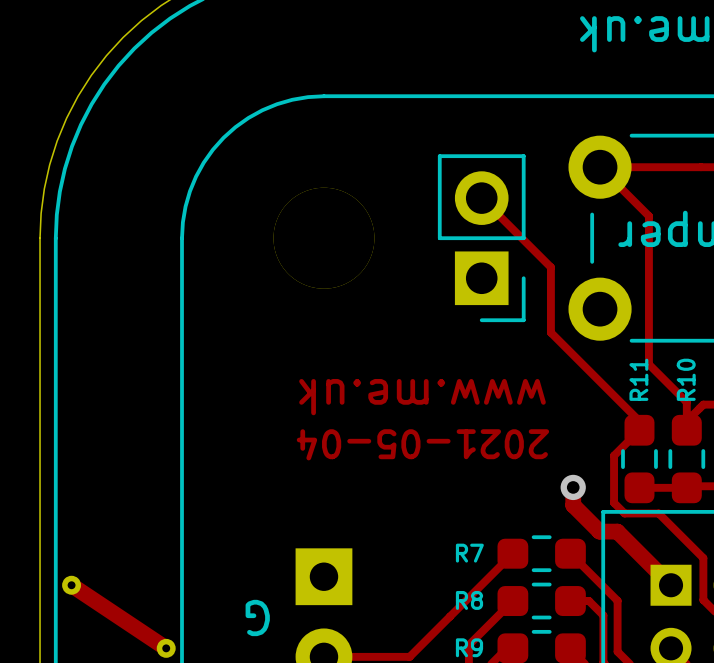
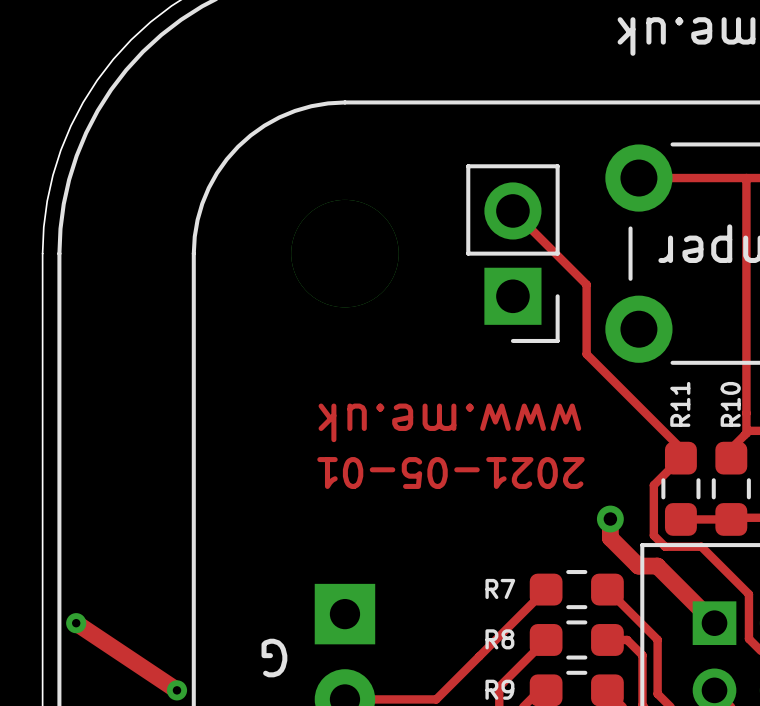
track: (600, 167) (648, 216) (648, 364) (686, 402) (686, 421) -> none
track: none -> (746, 178) (746, 433)
text: 2021-05-04 (422, 444) -> 2021-05-01 (450, 473)

